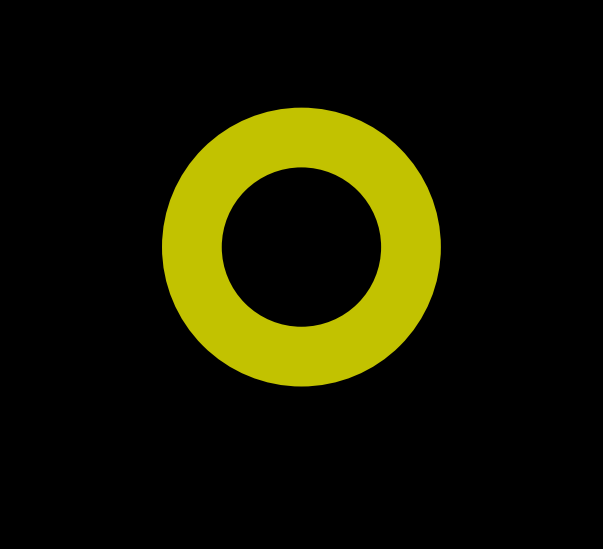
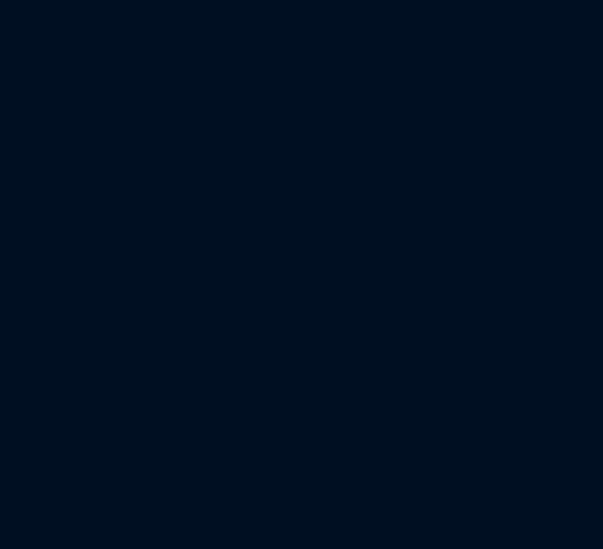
part: (301, 247) -> none

